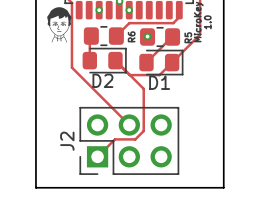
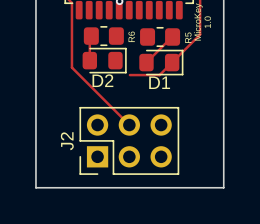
drawing: [47, 7, 72, 43] -> none
via: (99, 10) -> none
via: (129, 10) -> none
track: (179, 10) (179, 17) (173, 23) (129, 23) (113, 40) -> none
via: (147, 36) -> none
track: (119, 62) (115, 60) (143, 88) (143, 130) (135, 139) (114, 139) (97, 156) -> none

